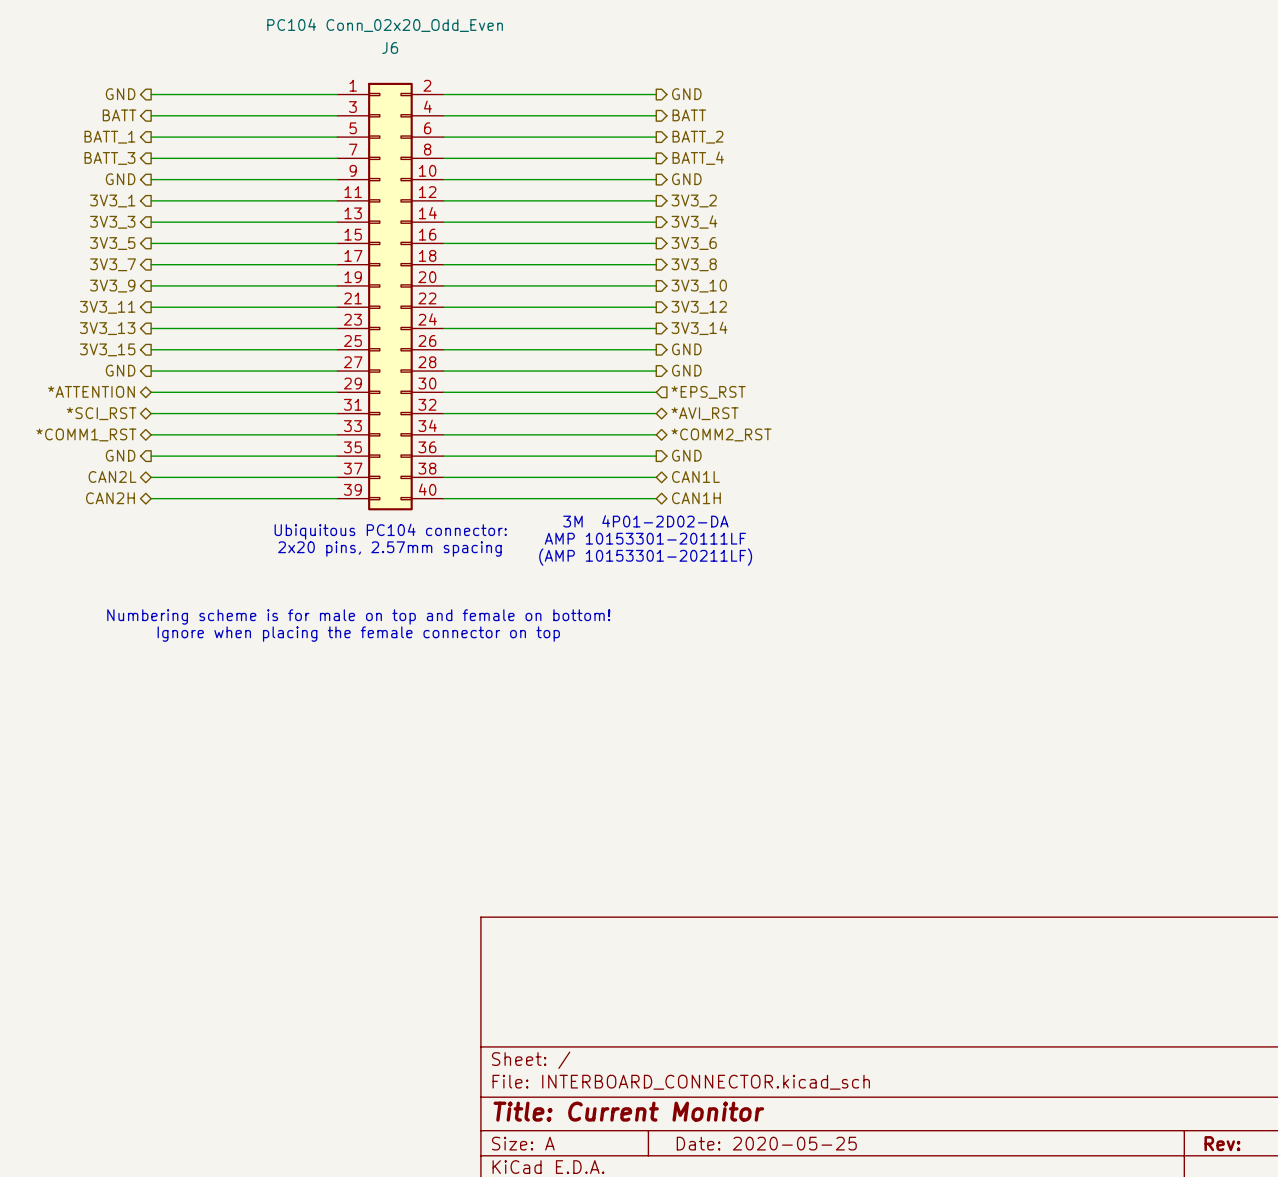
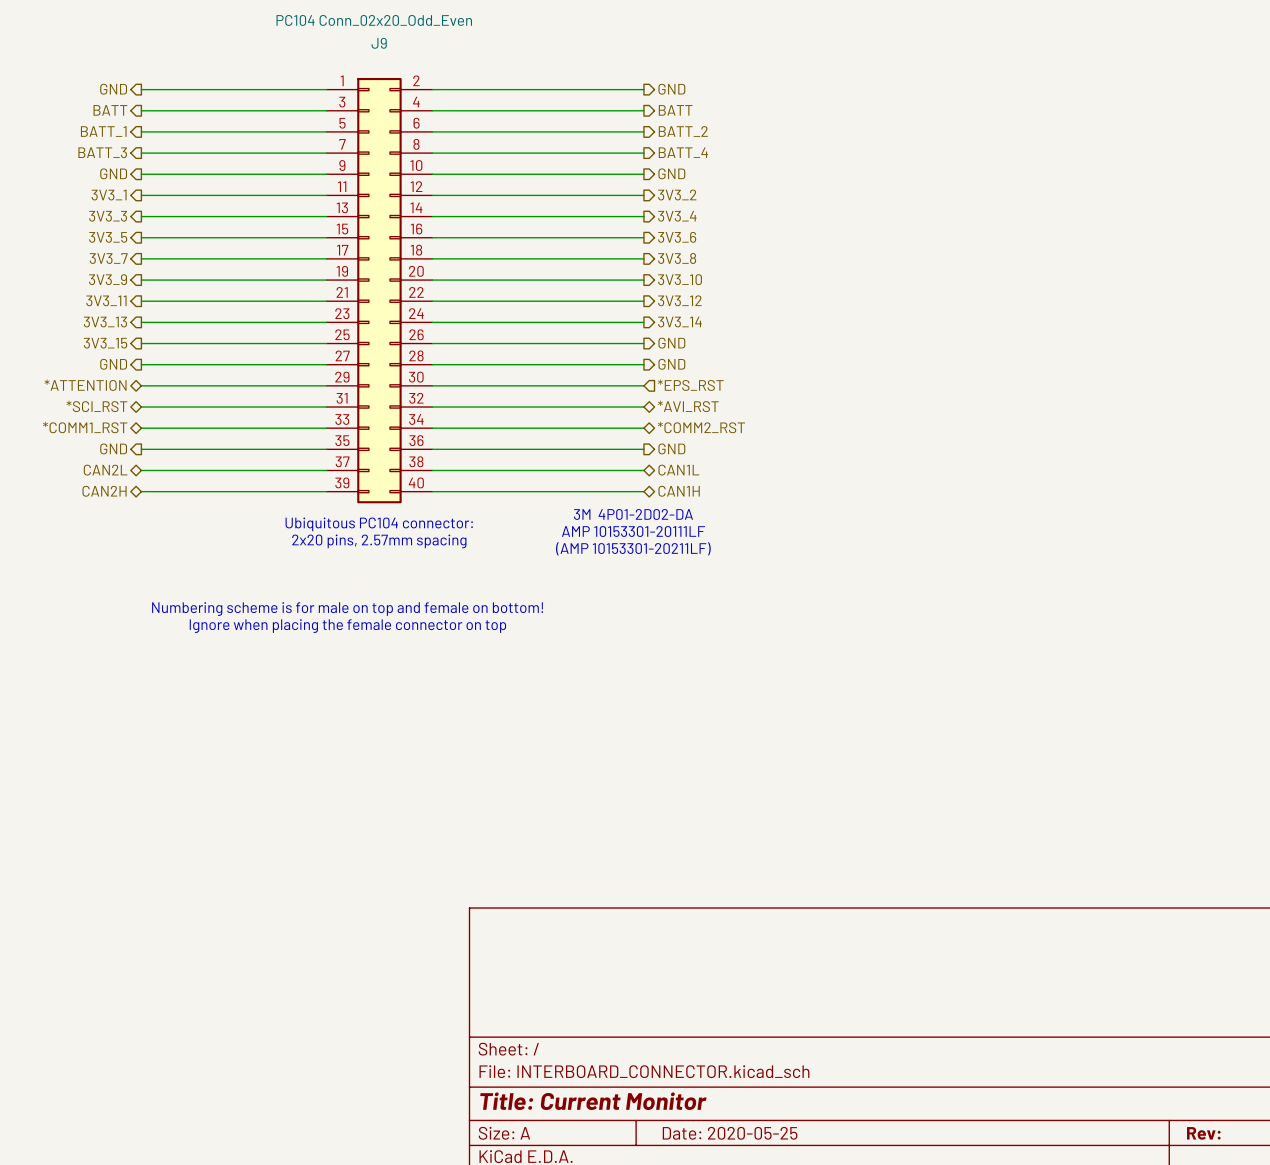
J6 name: J6 (390, 47) -> J9 (379, 43)

